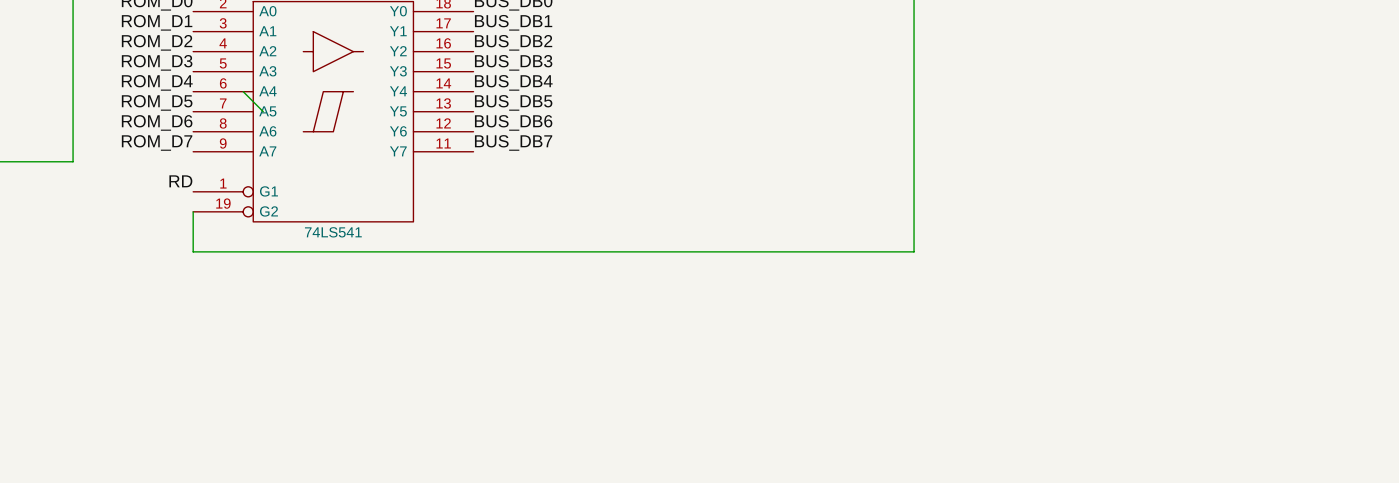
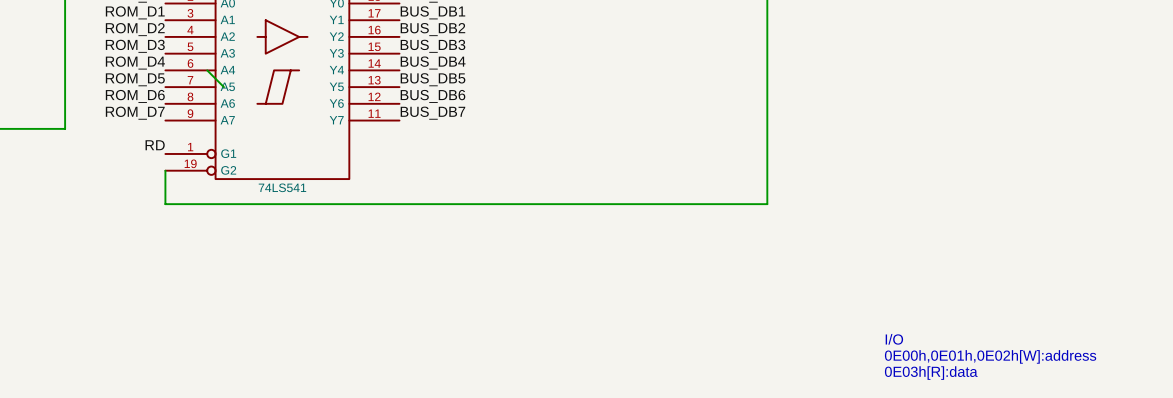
text: none -> I/O (894, 339)
text: none -> 0E00h,0E01h,0E02h[W]:address (990, 356)
text: none -> 0E03h[R]:data (931, 373)

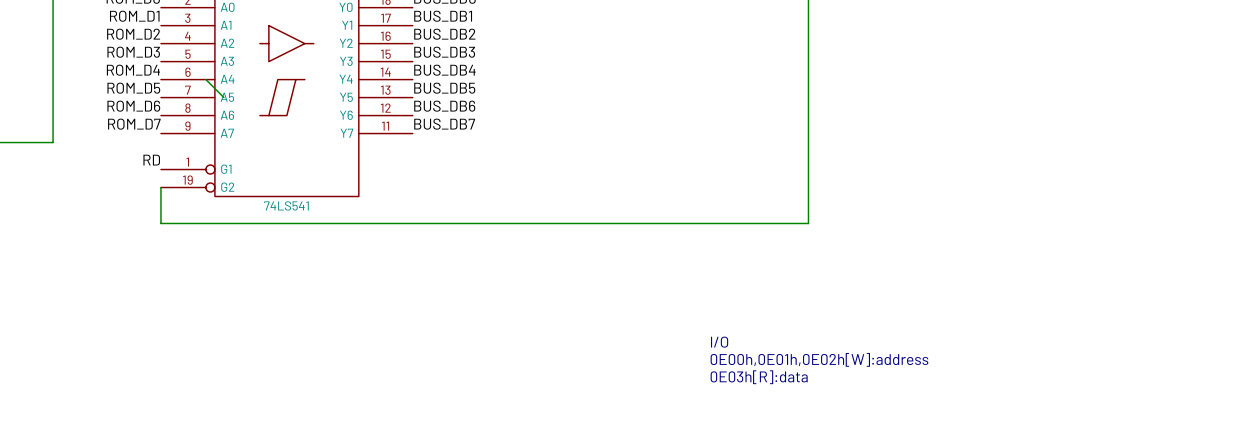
text: none -> I/O (719, 342)
text: none -> 0E00h,0E01h,0E02h[W]:address (819, 359)
text: I/O (894, 339) -> none
text: none -> 0E03h[R]:data (759, 377)
text: 0E00h,0E01h,0E02h[W]:address (990, 356) -> none
text: 0E03h[R]:data (931, 373) -> none

